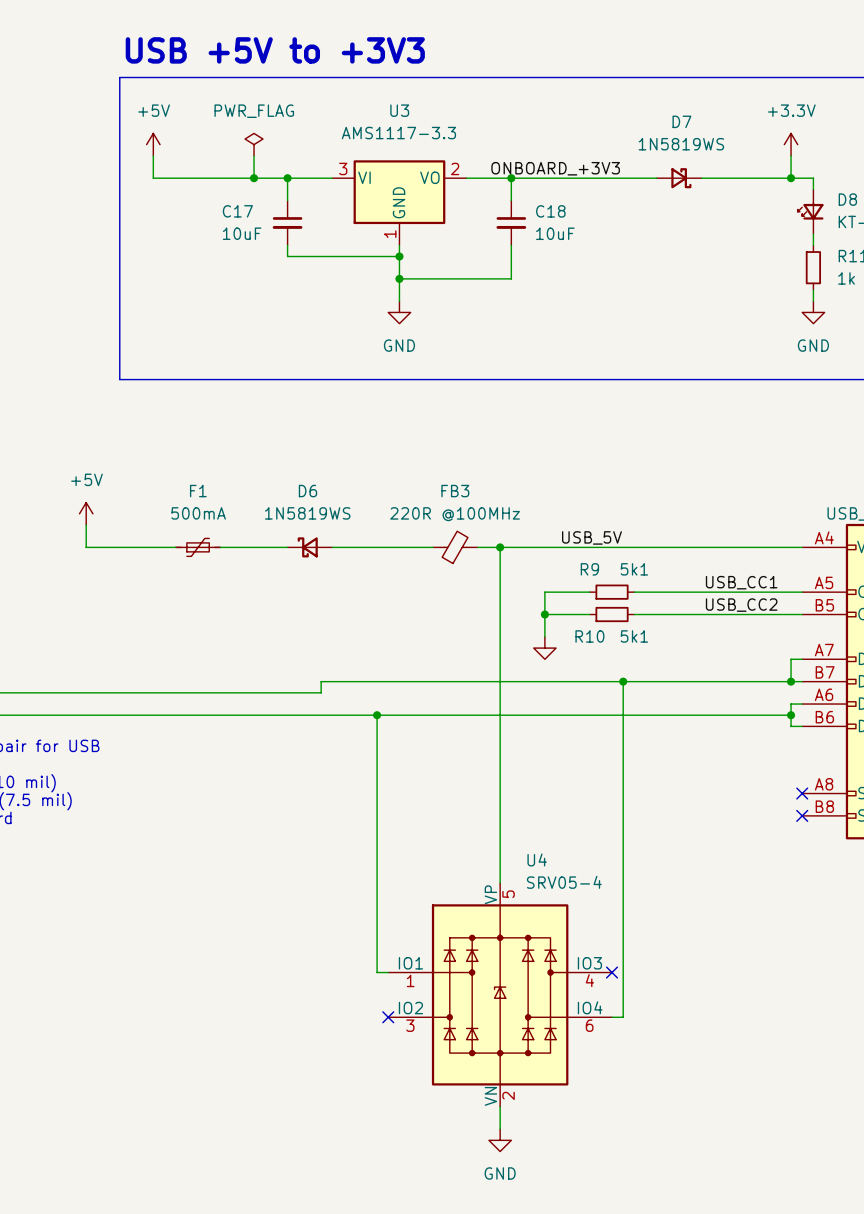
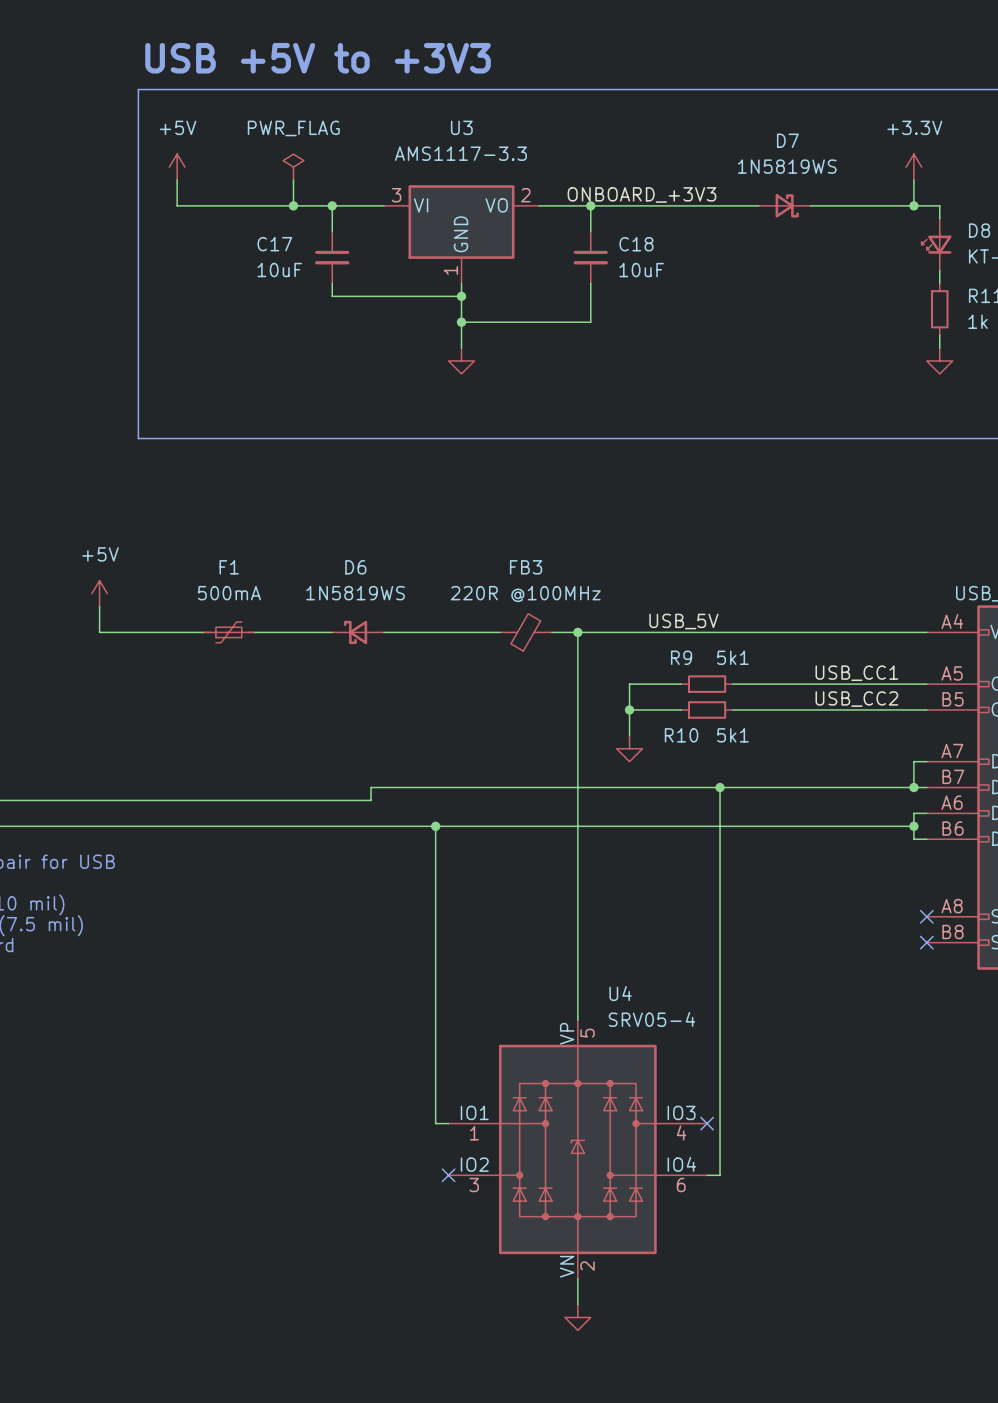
power symbol text: GND (399, 345) -> none
power symbol text: GND (813, 345) -> none
power symbol text: GND (500, 1173) -> none

